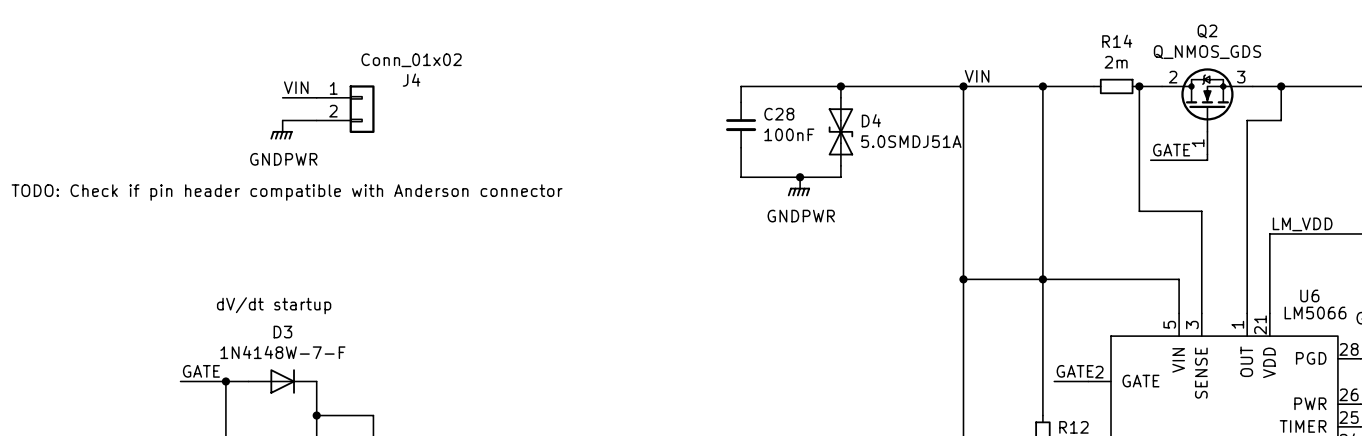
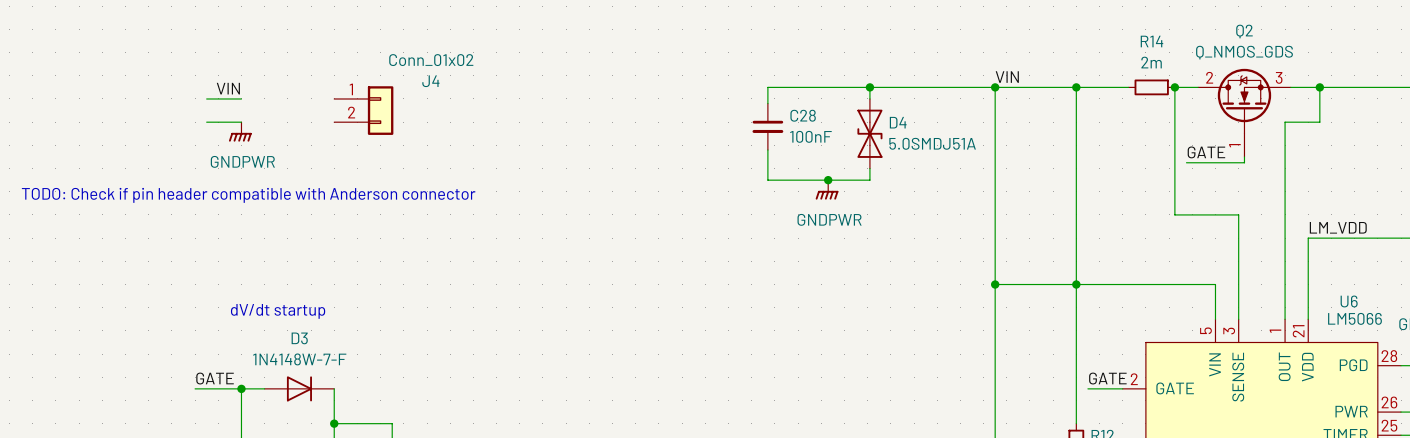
label position: VIN (296, 87) -> VIN (228, 88)
wire: (282, 97) (316, 97) -> (206, 98) (241, 98)
wire: (282, 120) (316, 120) -> (206, 122) (241, 122)
power symbol position: GNDPWR (281, 130) -> GNDPWR (240, 131)

